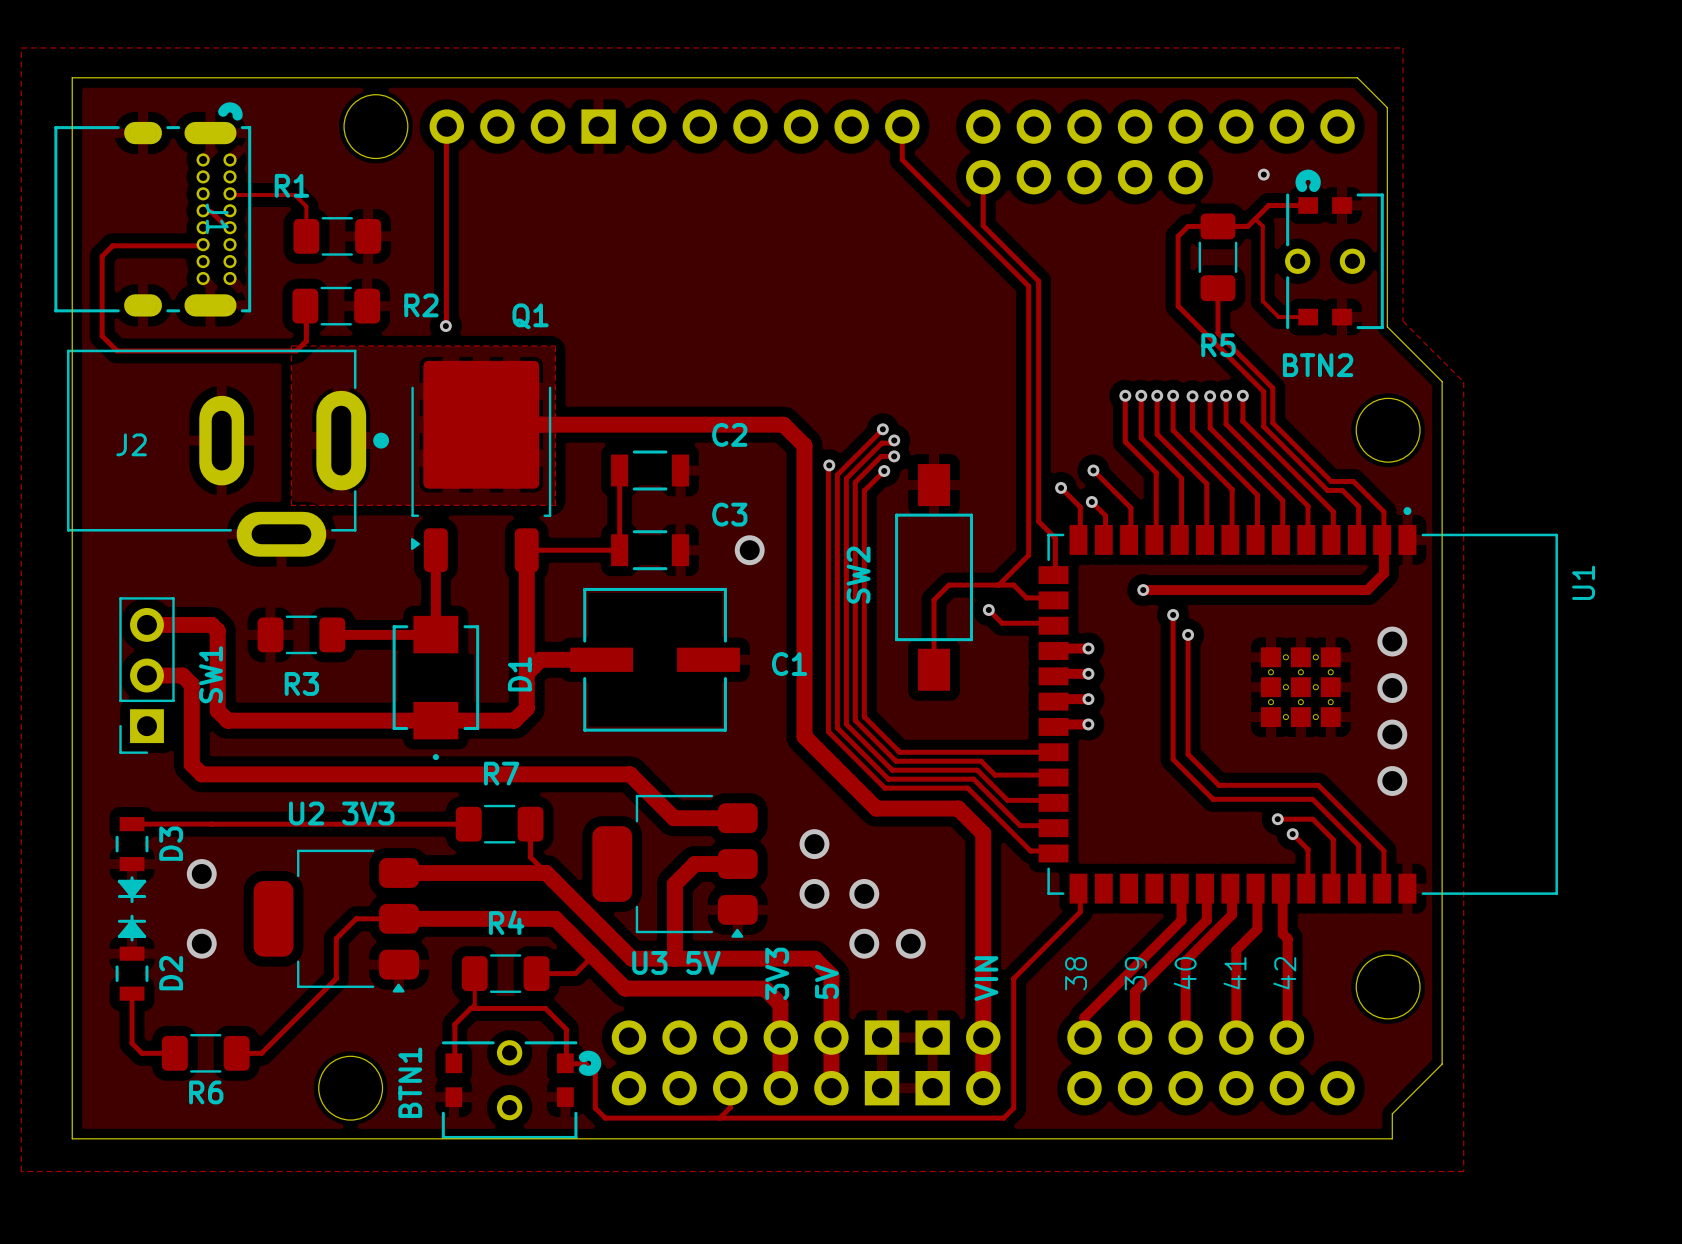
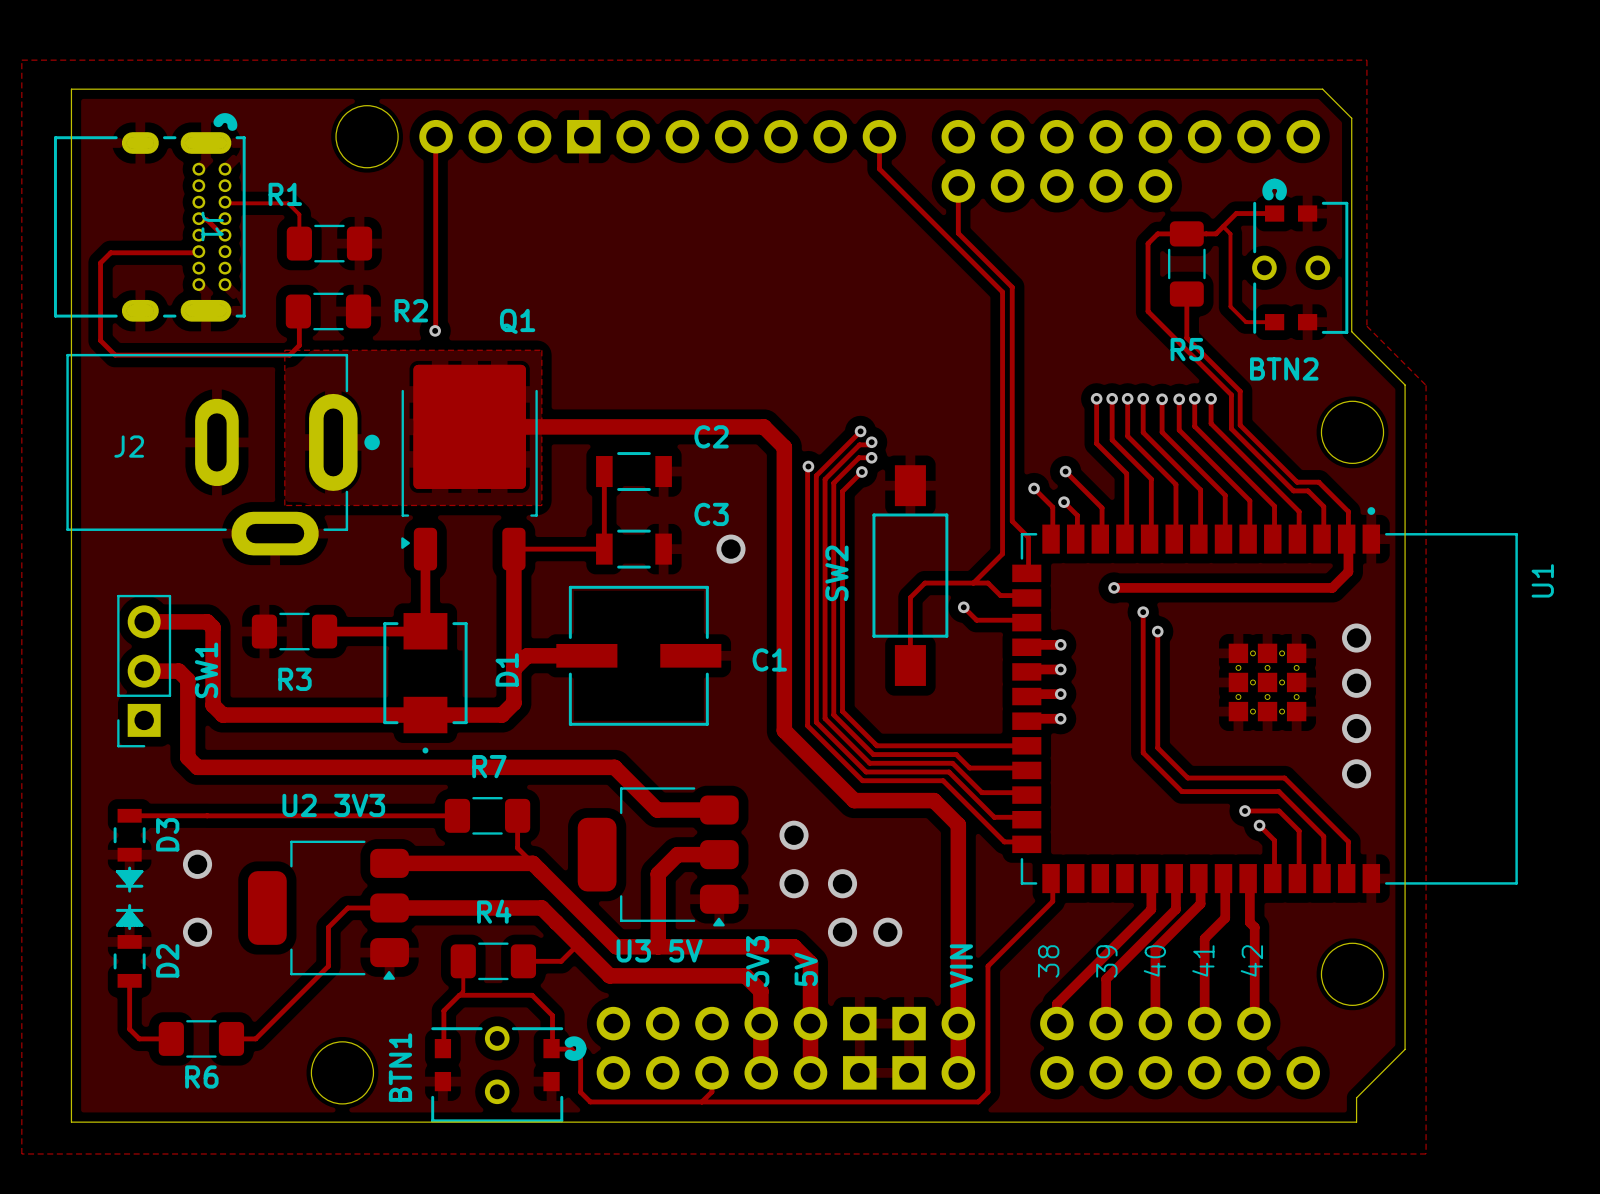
via: (1263, 174) -> none

